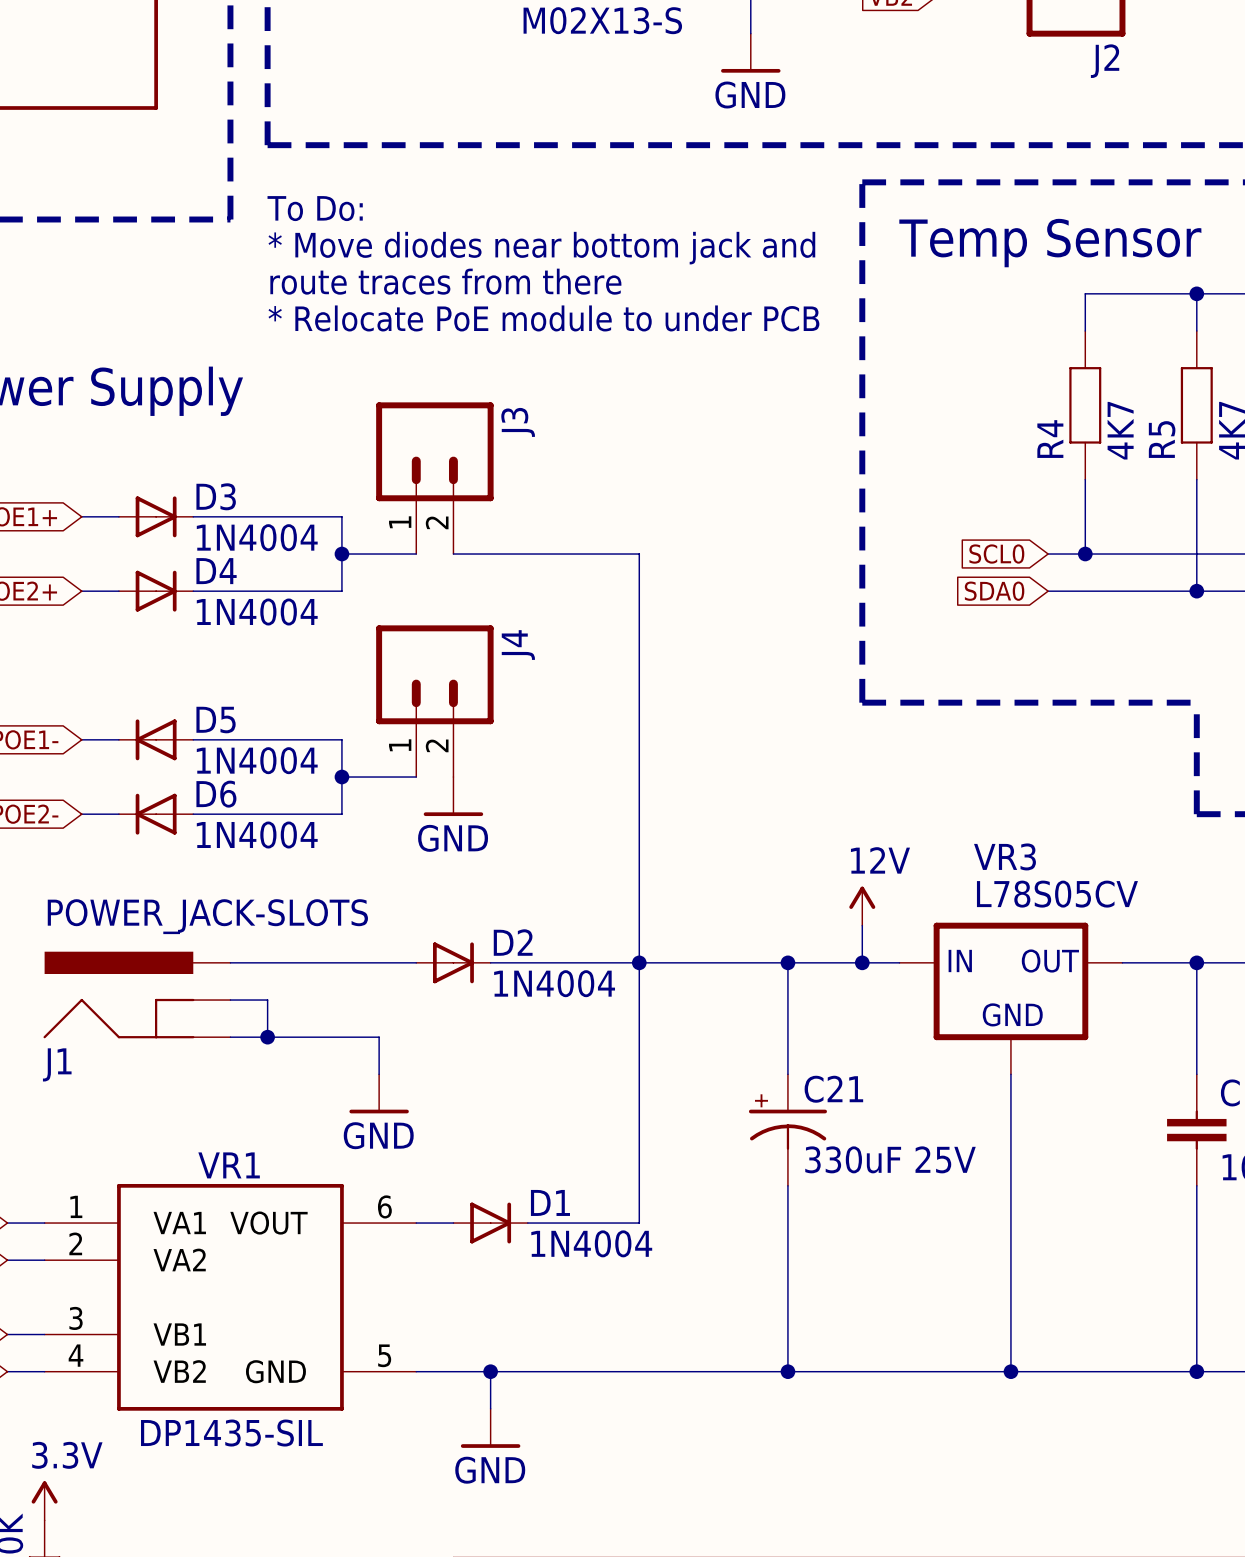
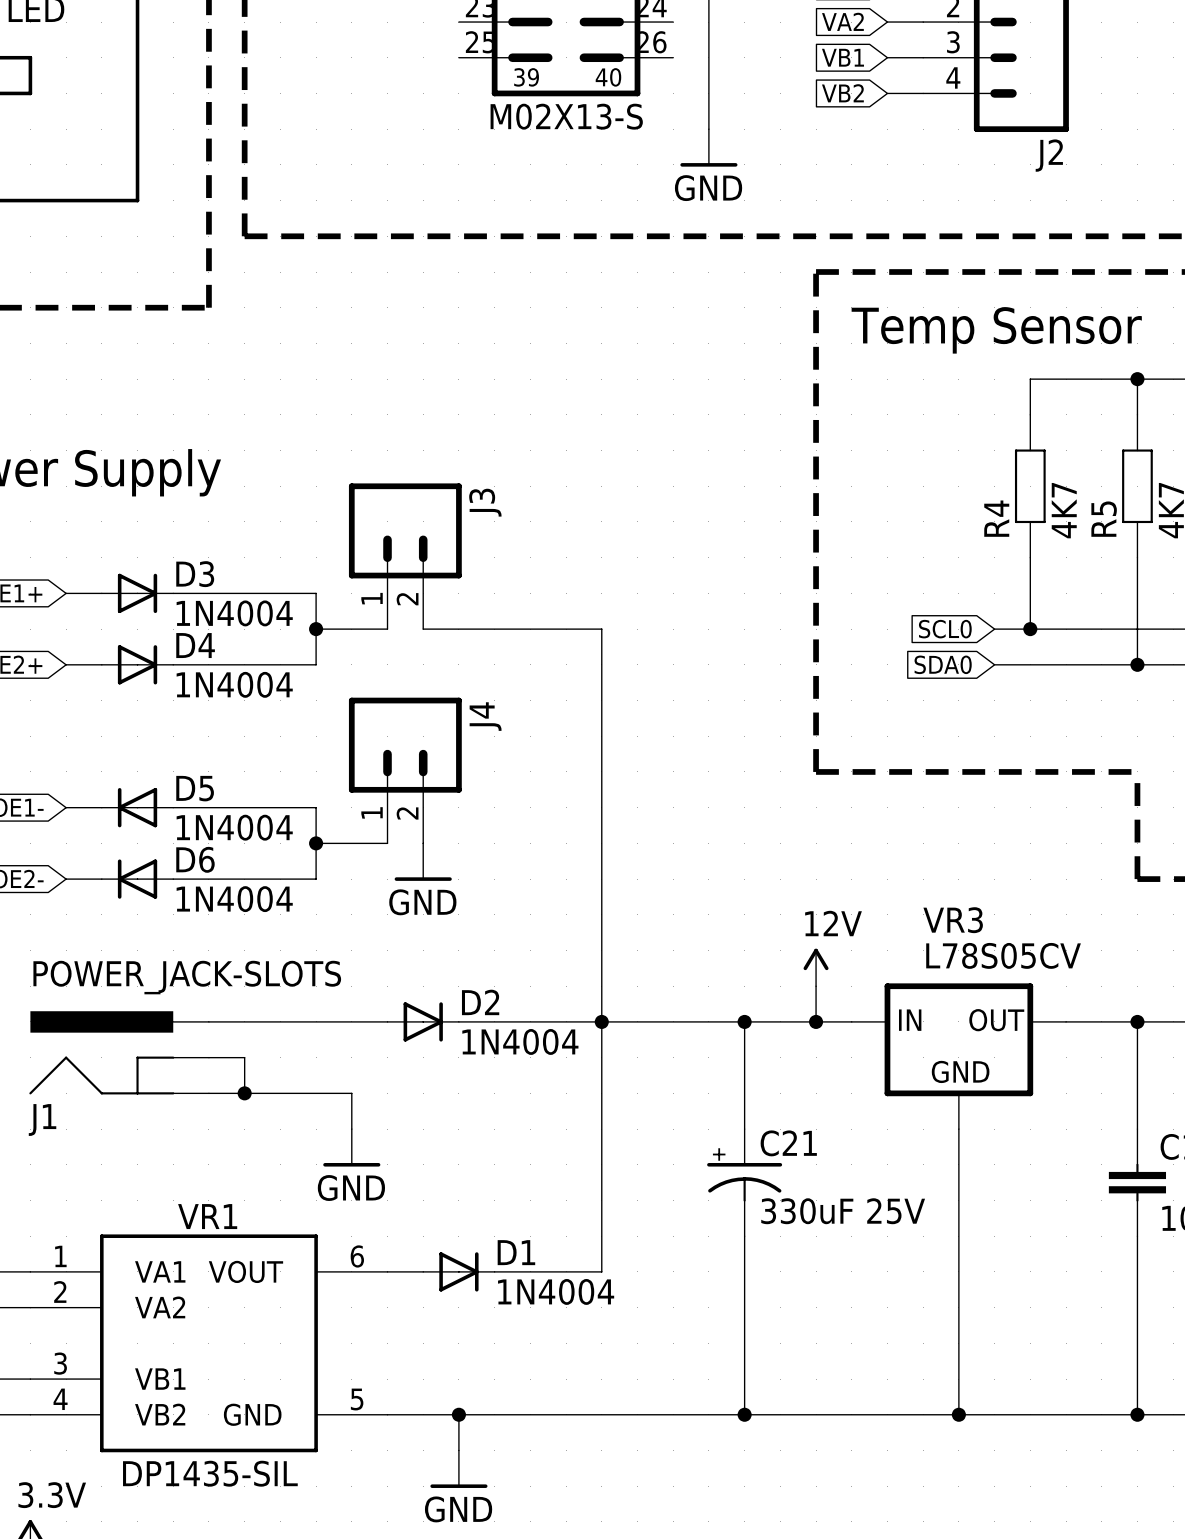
text: To Do: (315, 208) -> none
text: * Move diodes near bottom jack and (541, 248) -> none
text: route traces from there (445, 281) -> none
text: * Relocate PoE module to under PCB (543, 318) -> none

